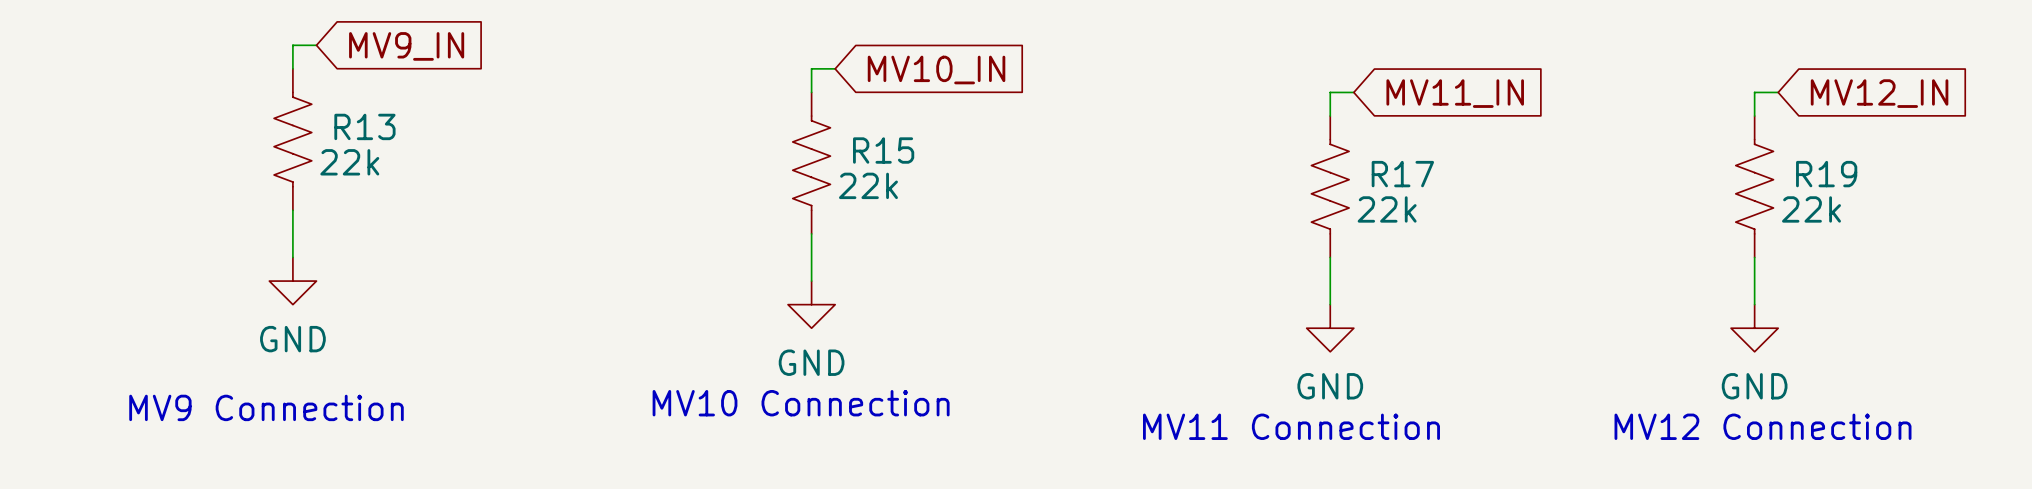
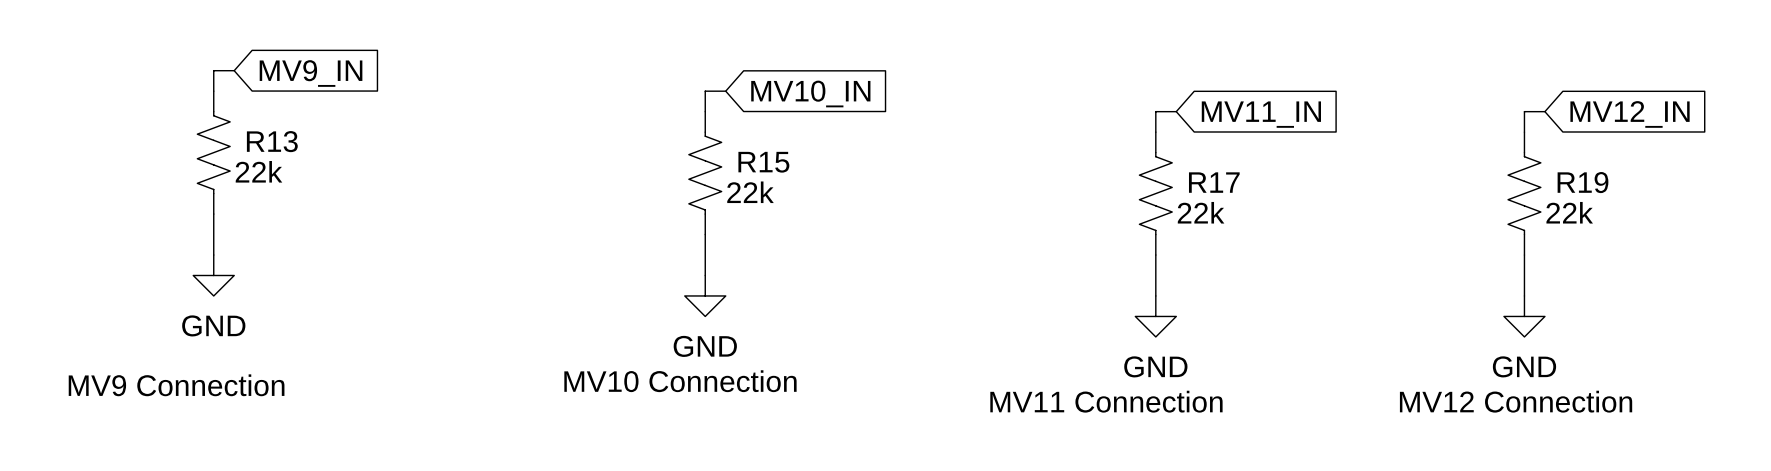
wire: (316, 45) (292, 45) (292, 68) -> (234, 70) (213, 70) (213, 91)
global label position: MV9_IN (406, 46) -> MV9_IN (311, 73)
R13 position: (292, 139) -> (213, 152)
wire: (292, 210) (292, 257) -> (213, 214) (213, 255)
power symbol position: GND (292, 281) -> GND (213, 275)
text position: MV9 Connection (266, 407) -> MV9 Connection (176, 385)

